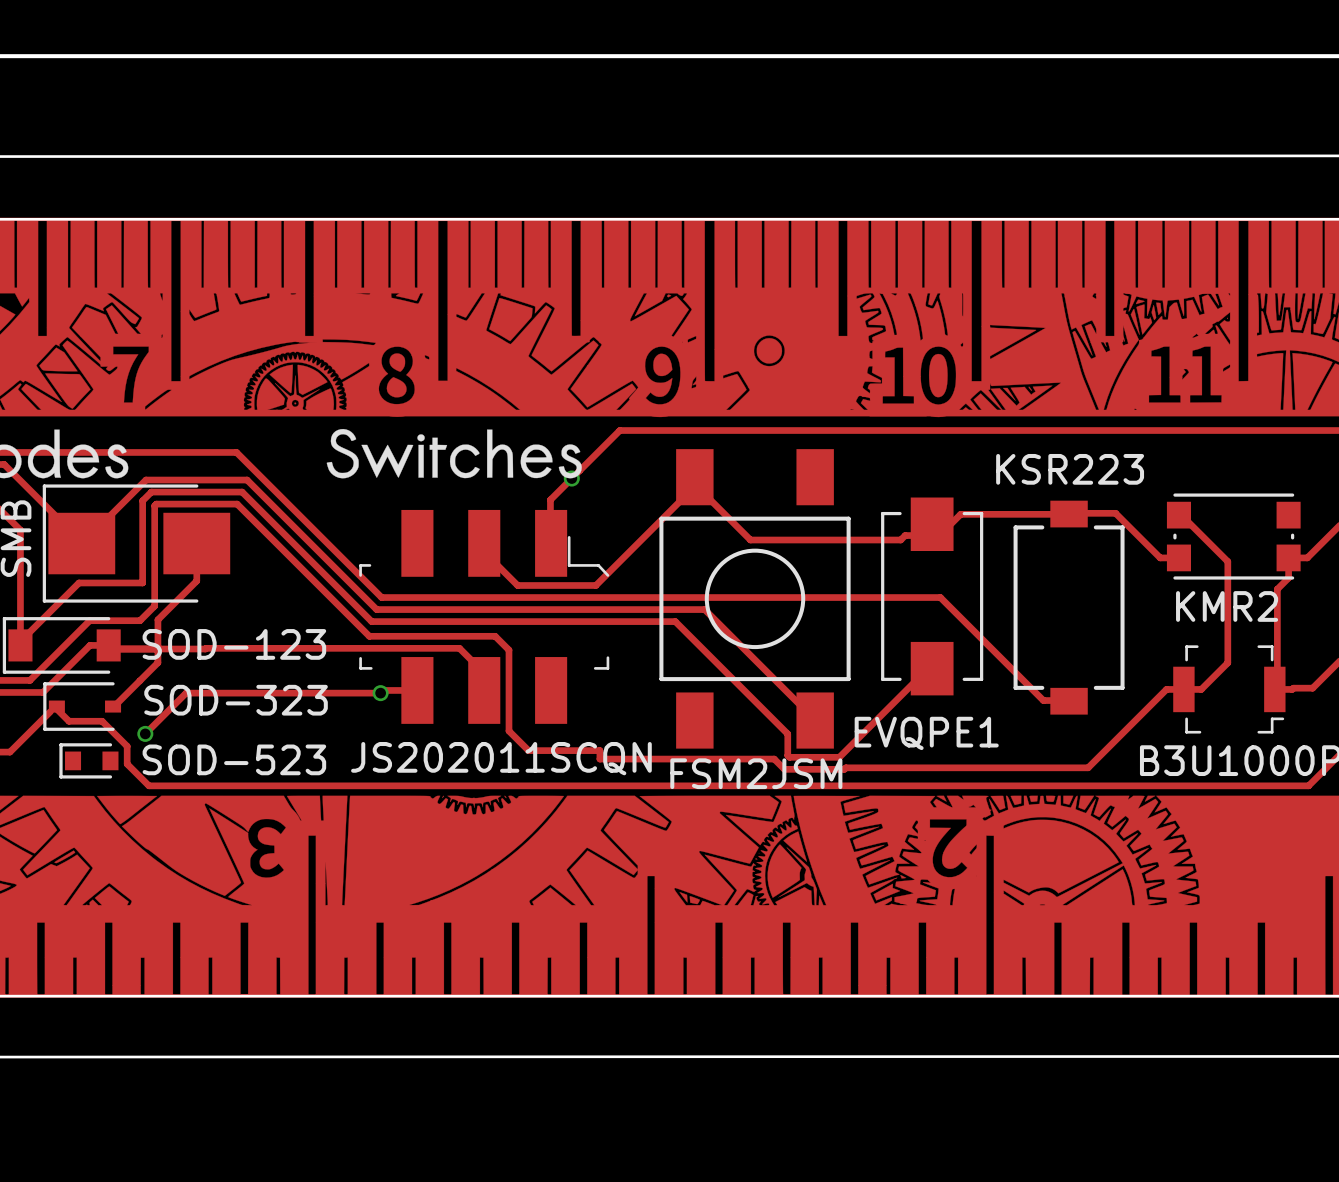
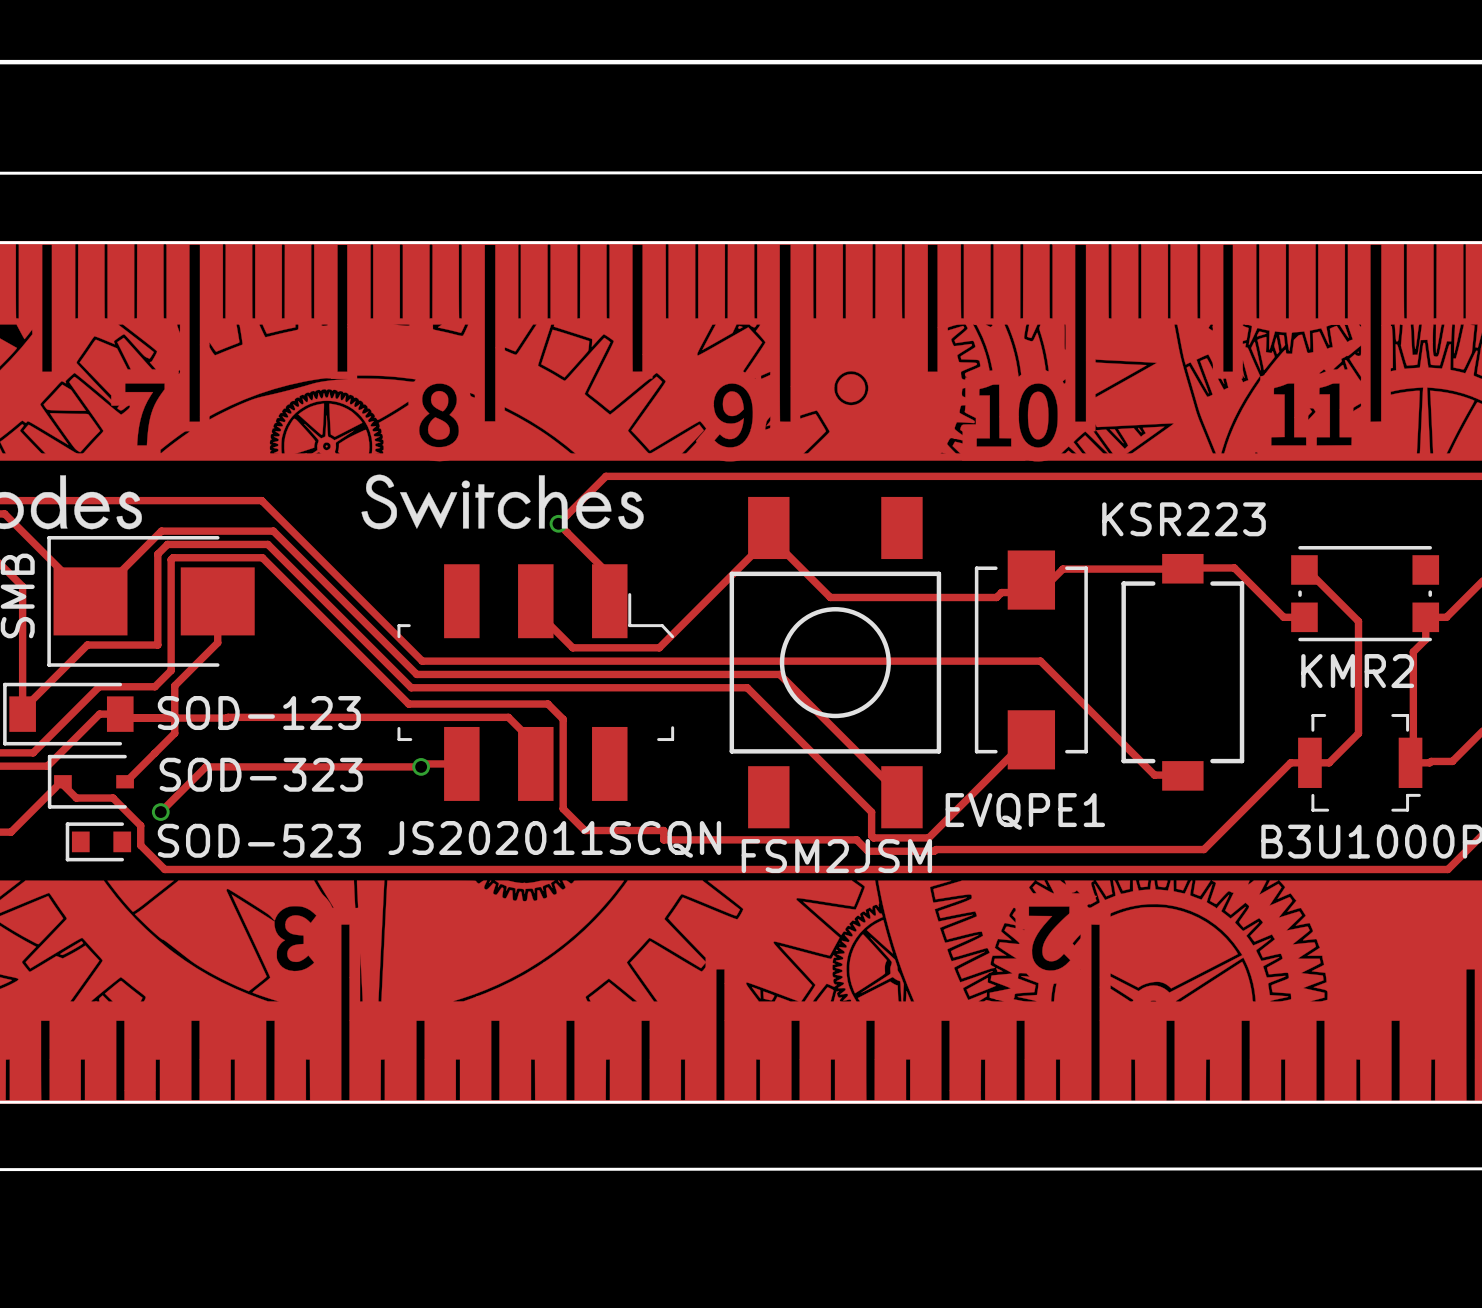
track: (619, 430) (550, 499) (550, 519) -> (685, 476) (605, 476) (558, 523) (609, 574)
via position: (571, 478) -> (558, 523)

